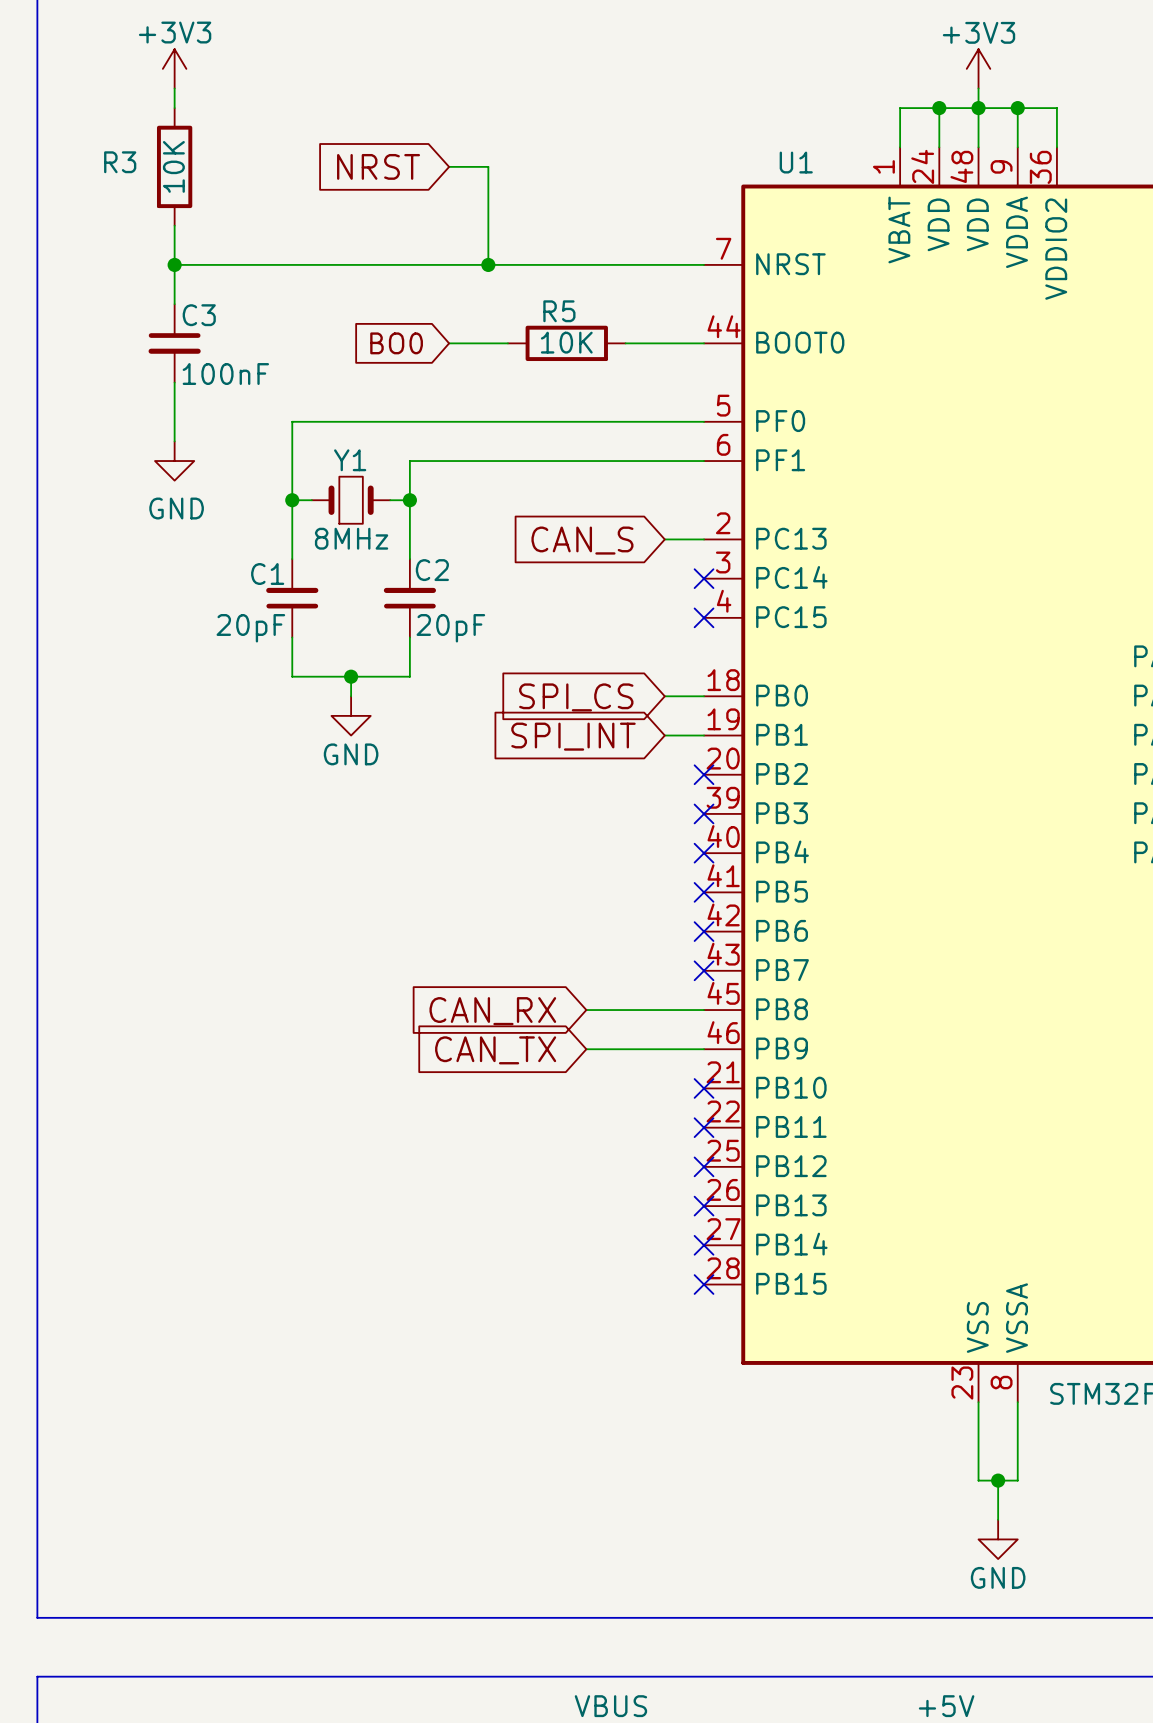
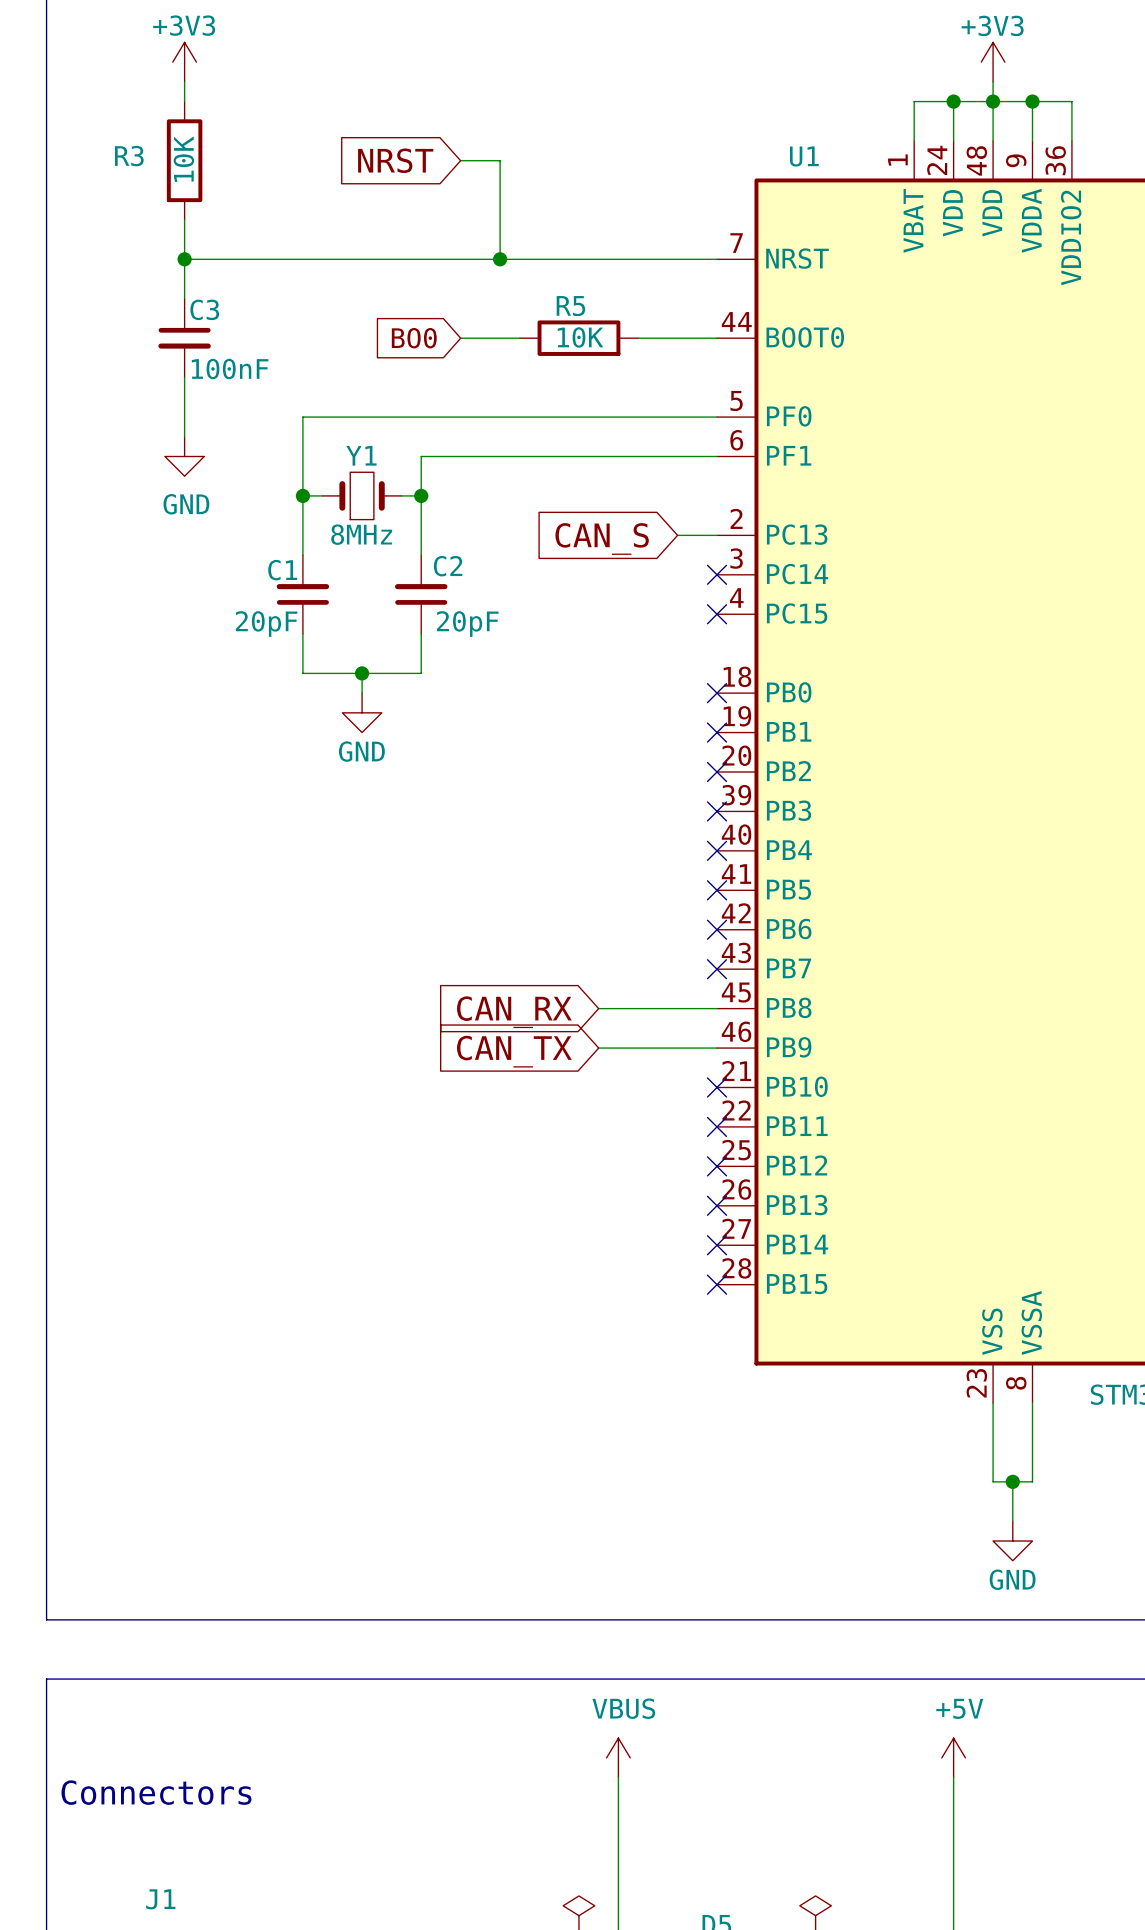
wire: (664, 696) (704, 696) -> none
no-connect mark: none -> (717, 693)
global label: SPI_CS (576, 697) -> none
wire: (664, 735) (704, 735) -> none
no-connect mark: none -> (717, 732)
global label: SPI_INT (573, 736) -> none

